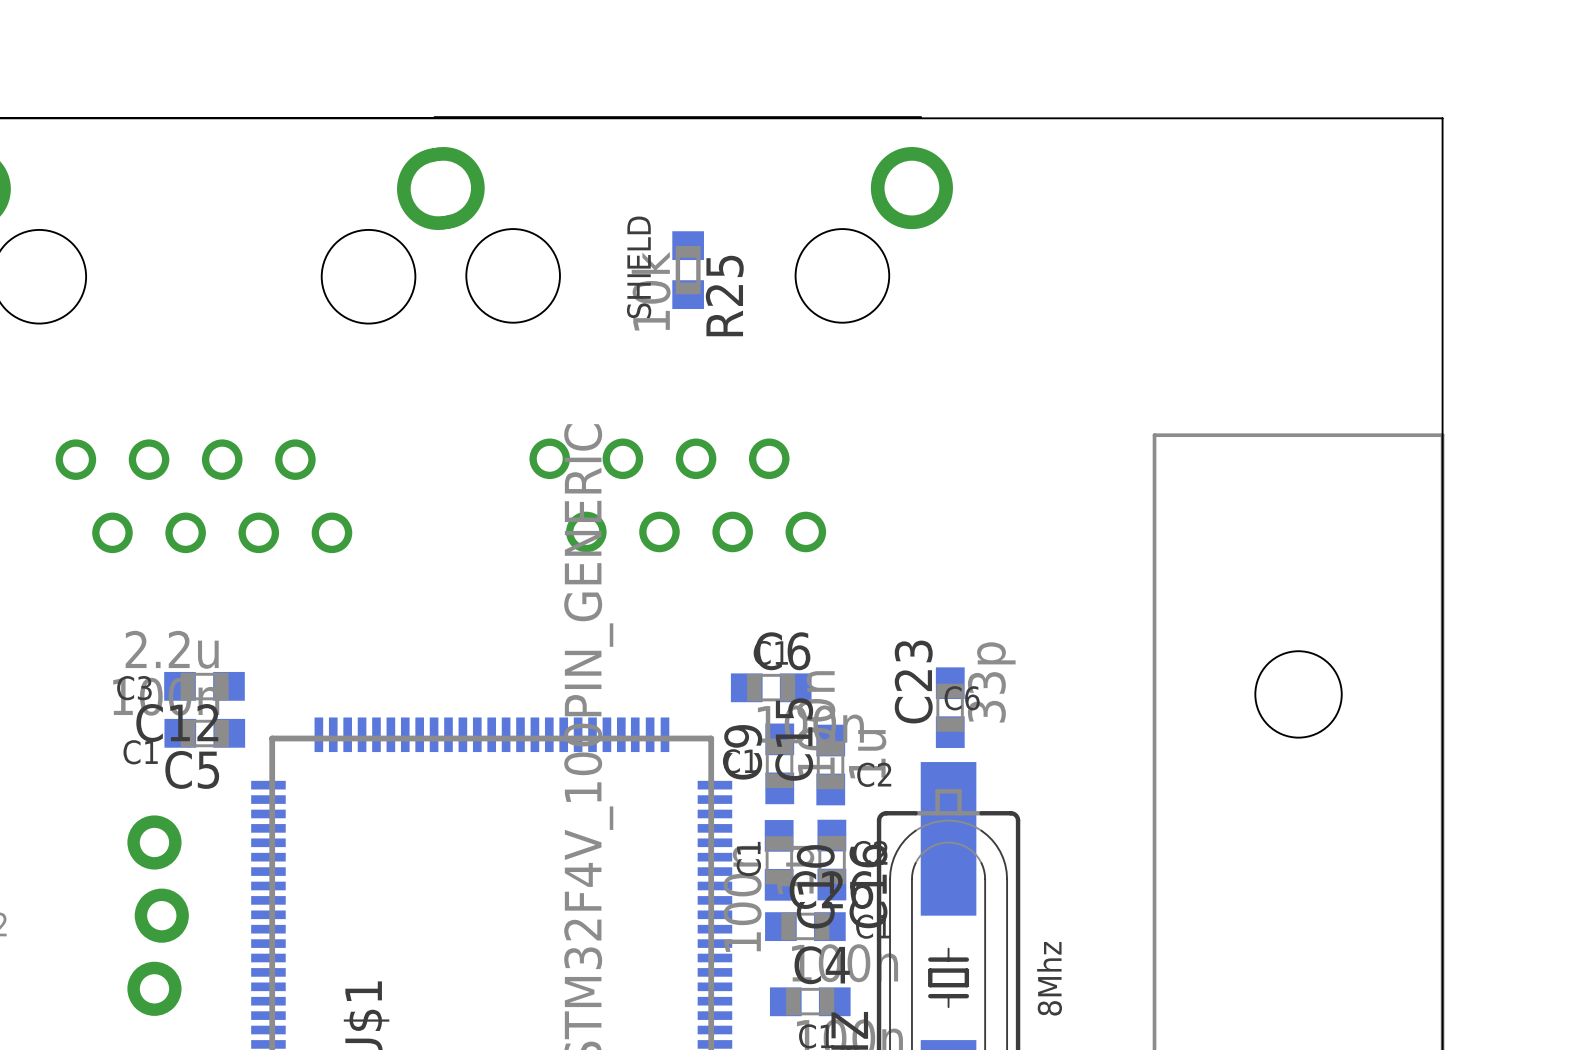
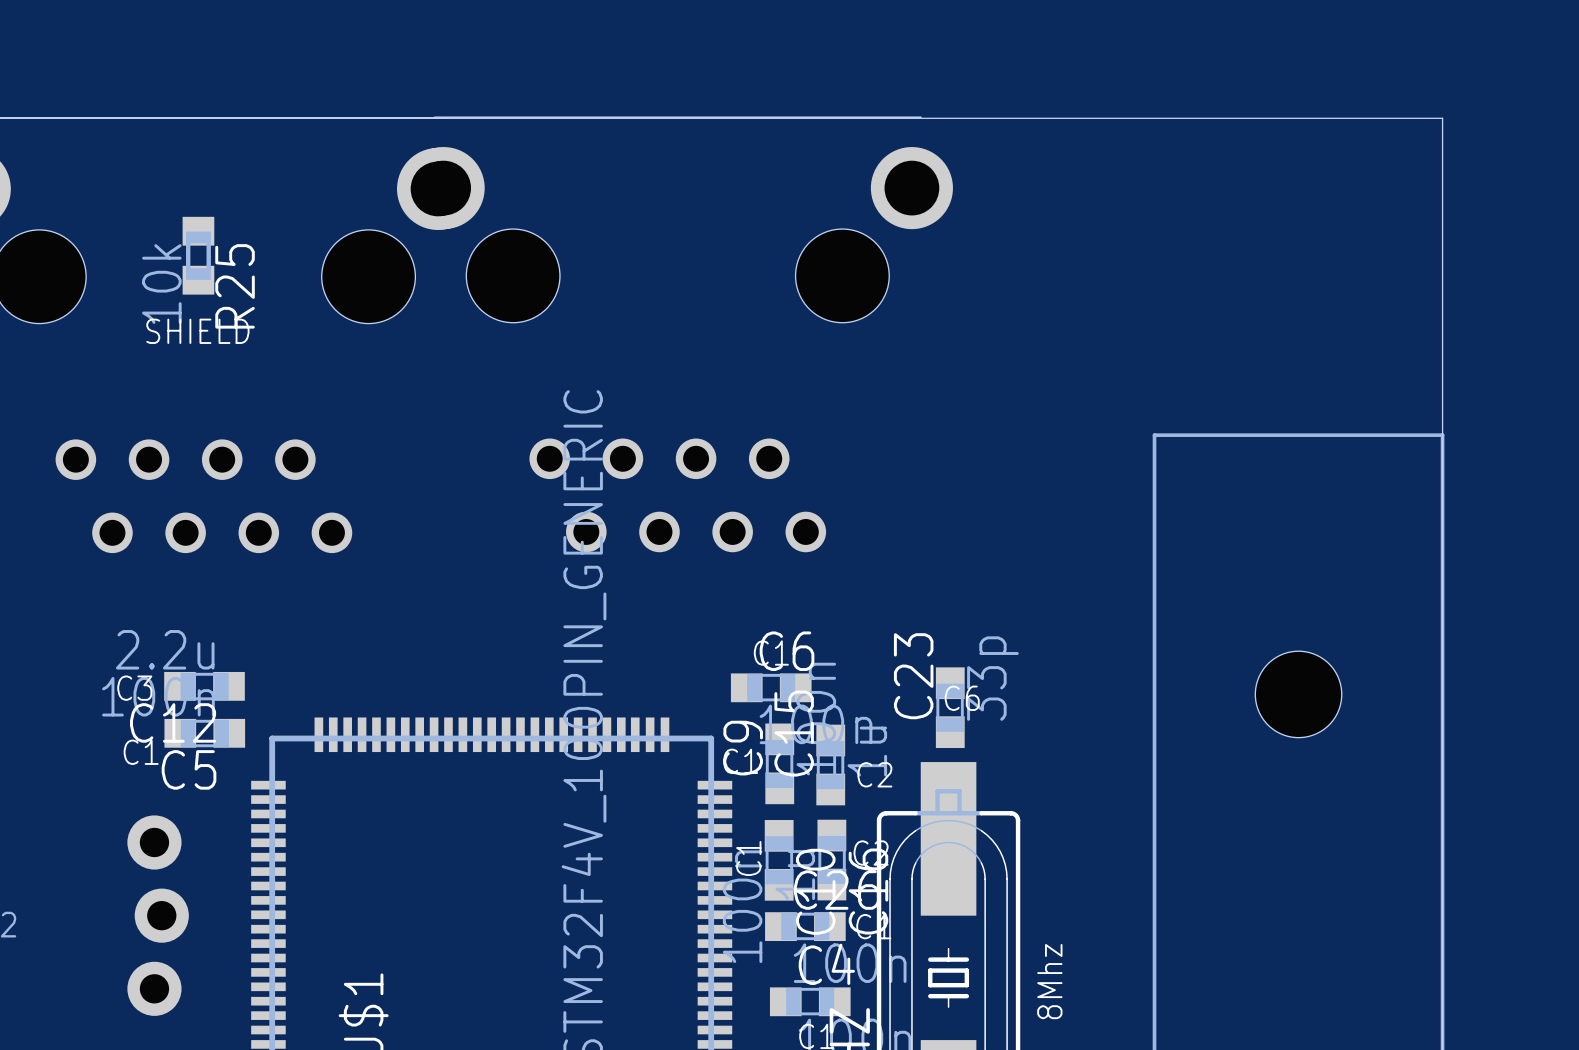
text rotation: 0° (639, 267) -> 90° clockwise (197, 331)
text position: SHIELD (639, 267) -> SHIELD (197, 331)
R25 position: (688, 270) -> (198, 255)

